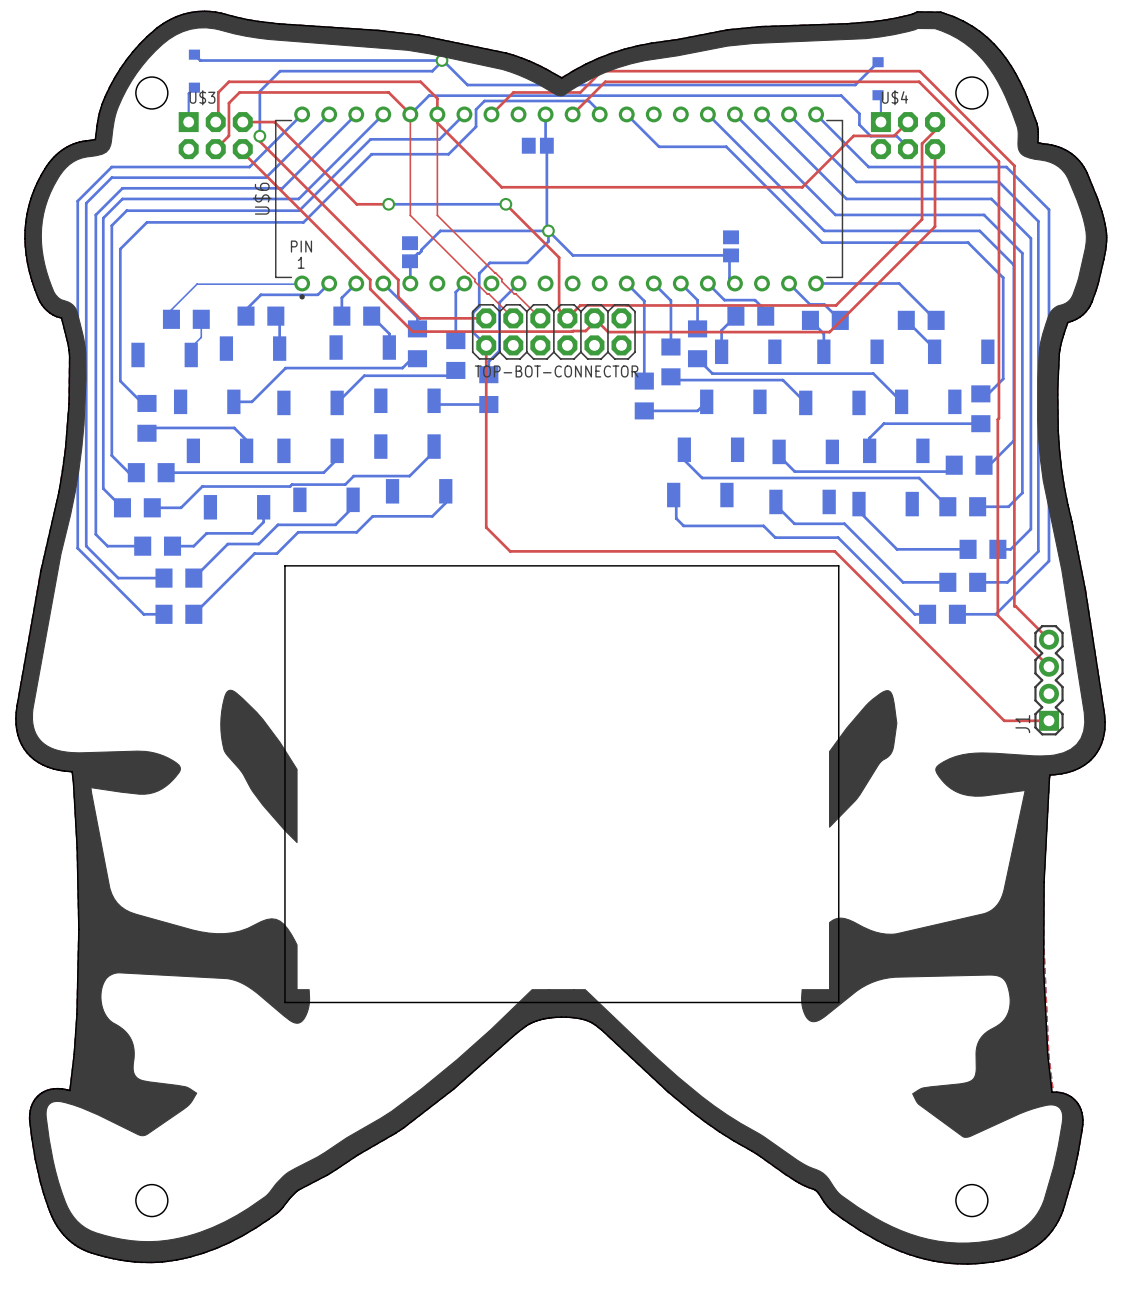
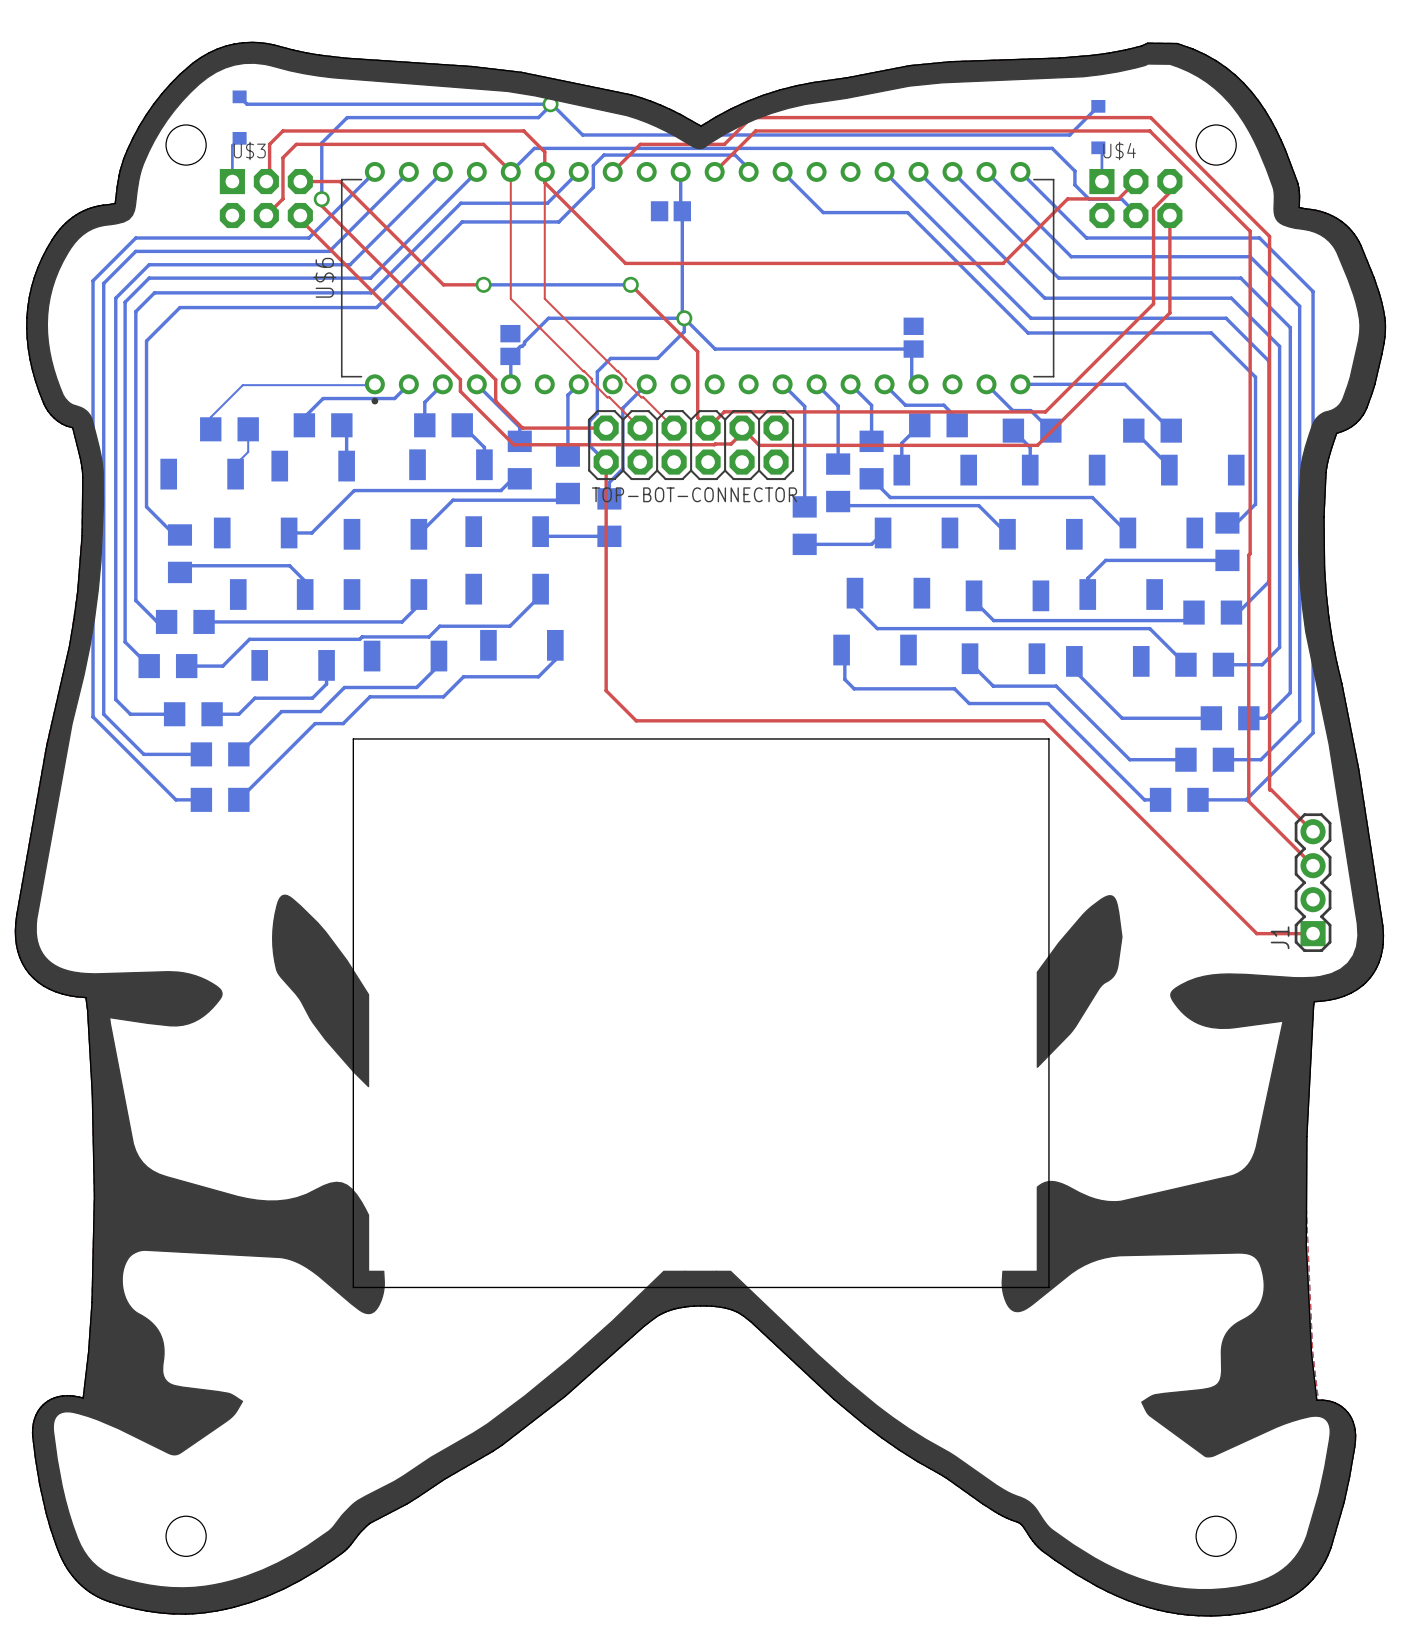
text: PIN (301, 246) -> none
text: 1 (301, 262) -> none

